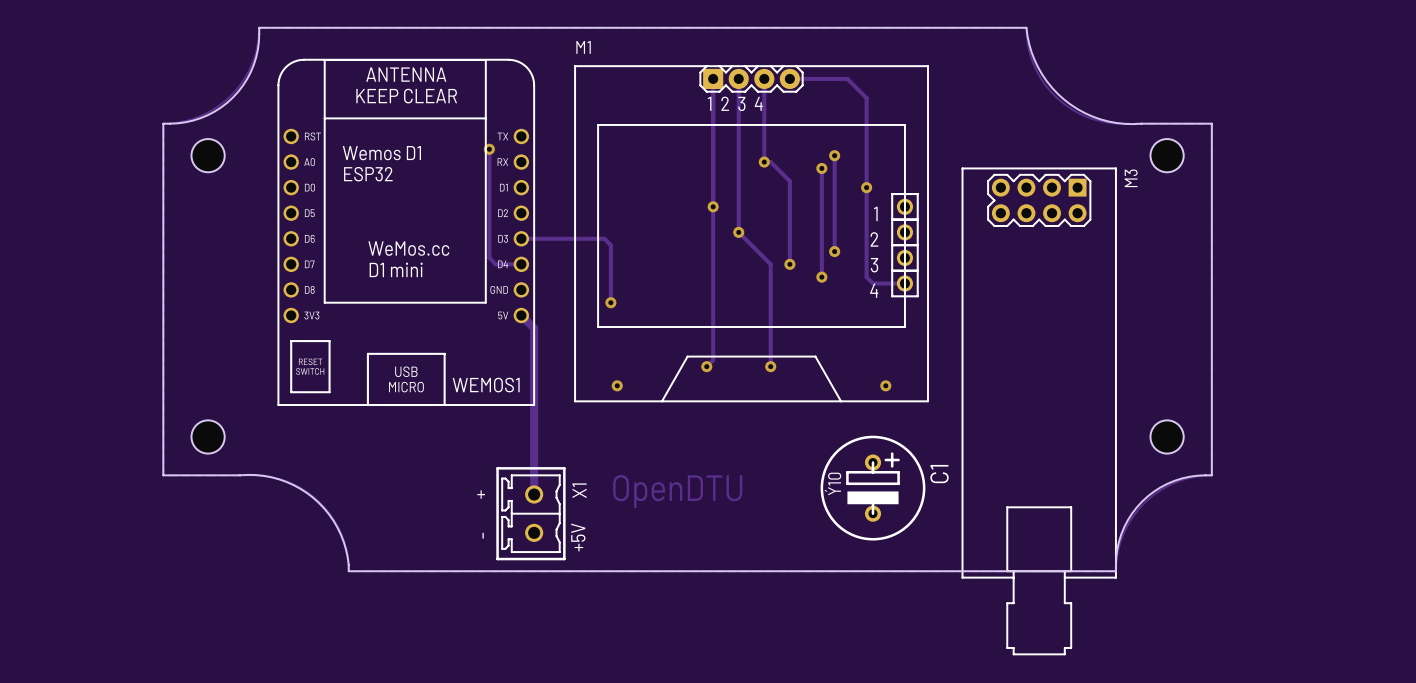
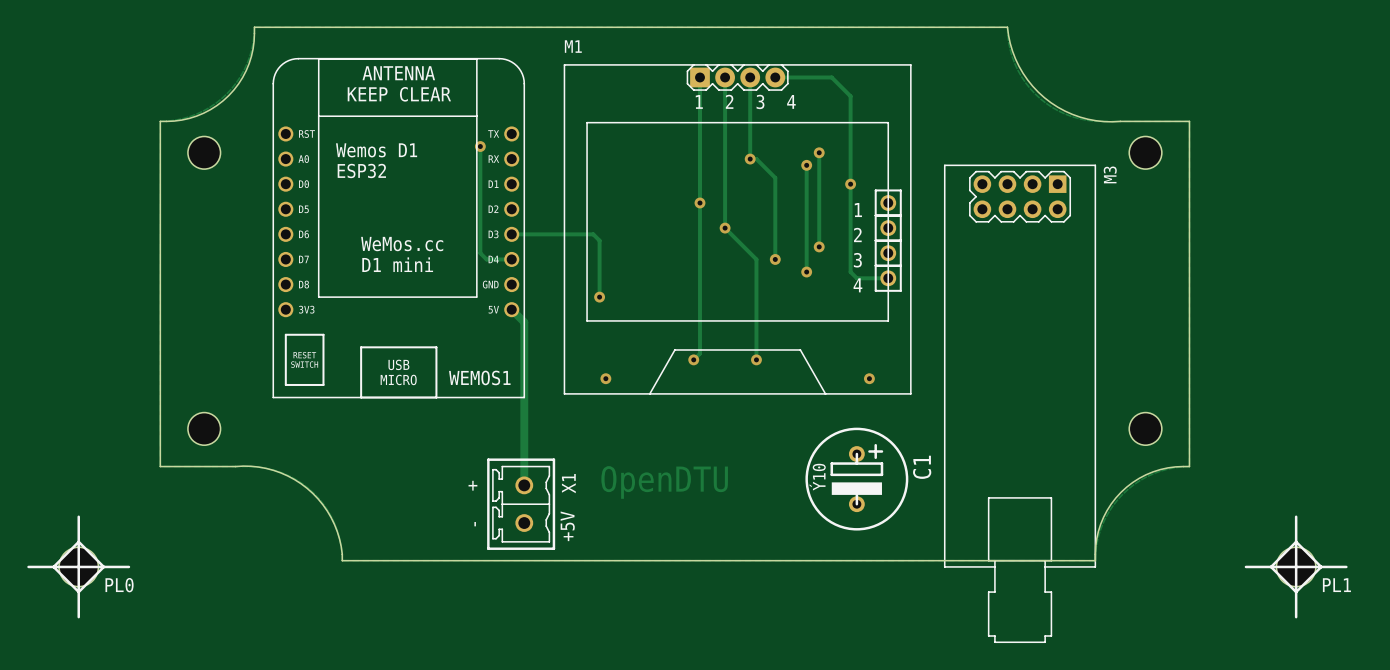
PL0: none -> (78, 566)
PL1: none -> (1296, 566)

